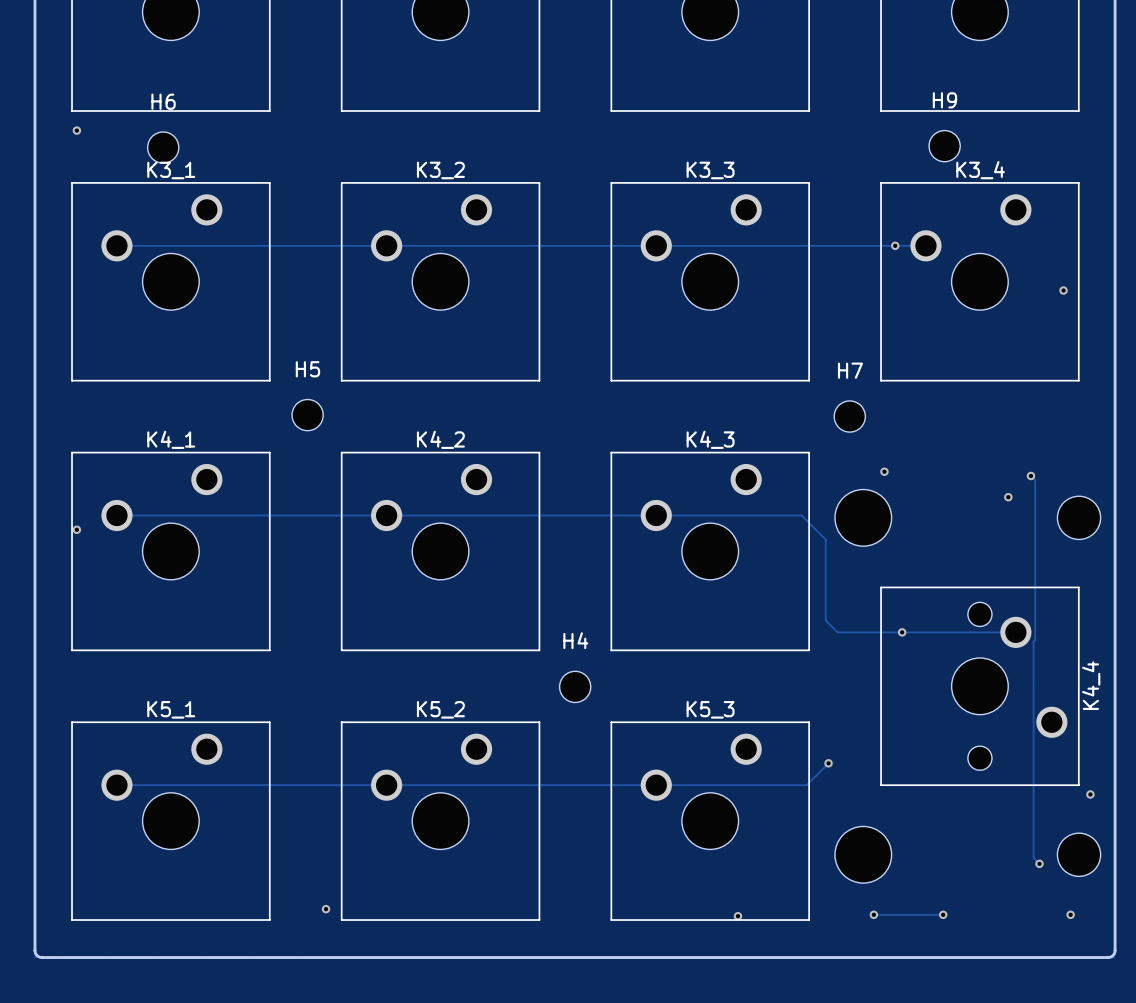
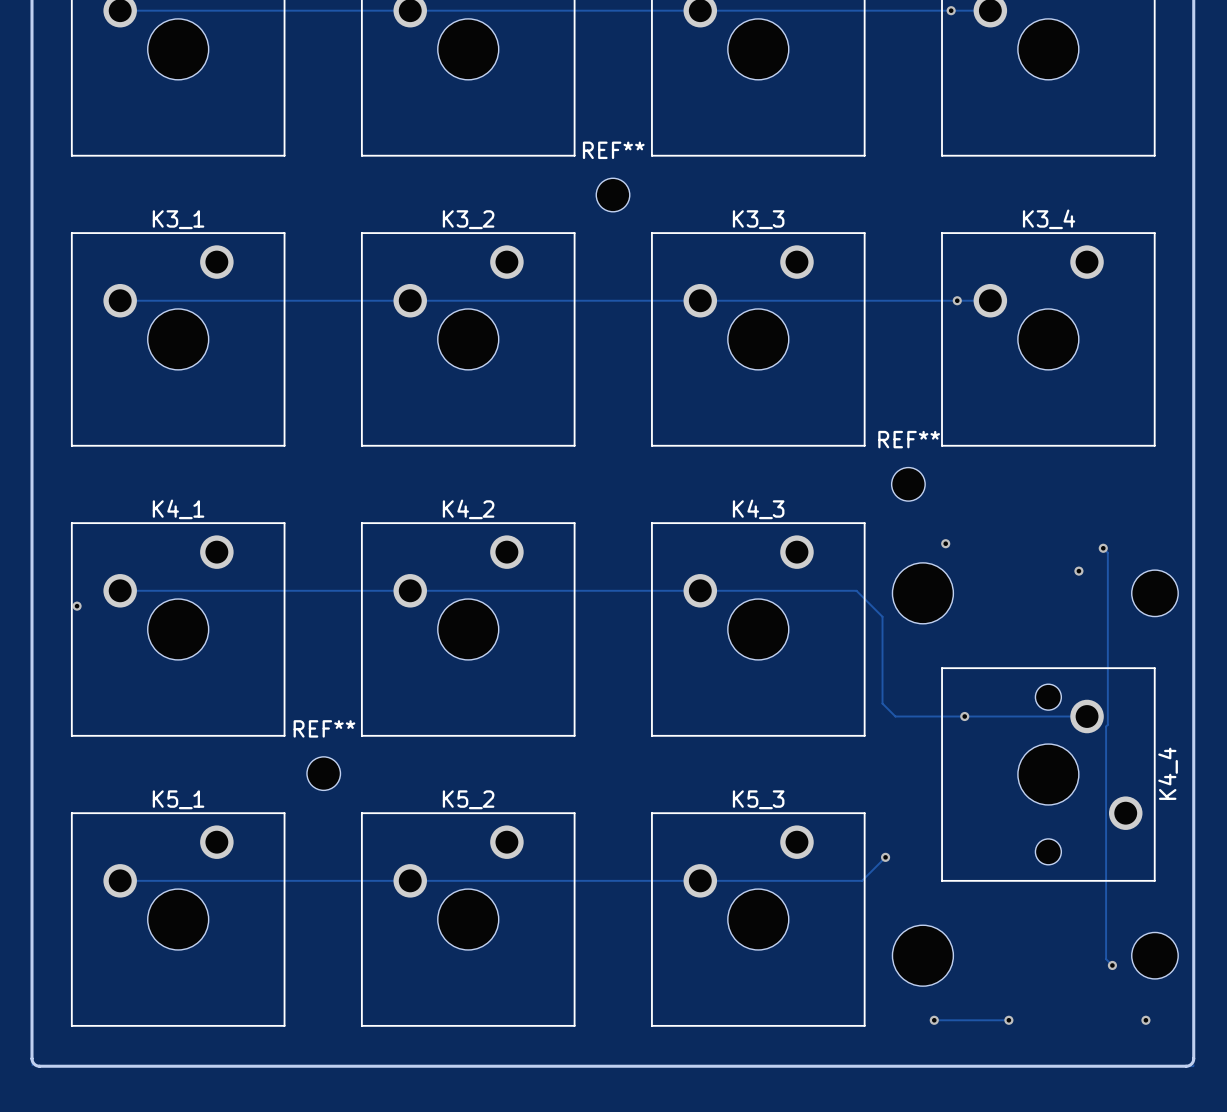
via: (76, 130) -> none
H9: (944, 146) -> none
H6: (163, 147) -> none
REF**: none -> (613, 195)
via: (1063, 290) -> none
H7 name: H7 (850, 370) -> REF** (909, 439)
H5: (307, 415) -> none
REF**: none -> (323, 773)
H4: (575, 686) -> none
via: (1090, 794) -> none
via: (326, 909) -> none
via: (737, 916) -> none

